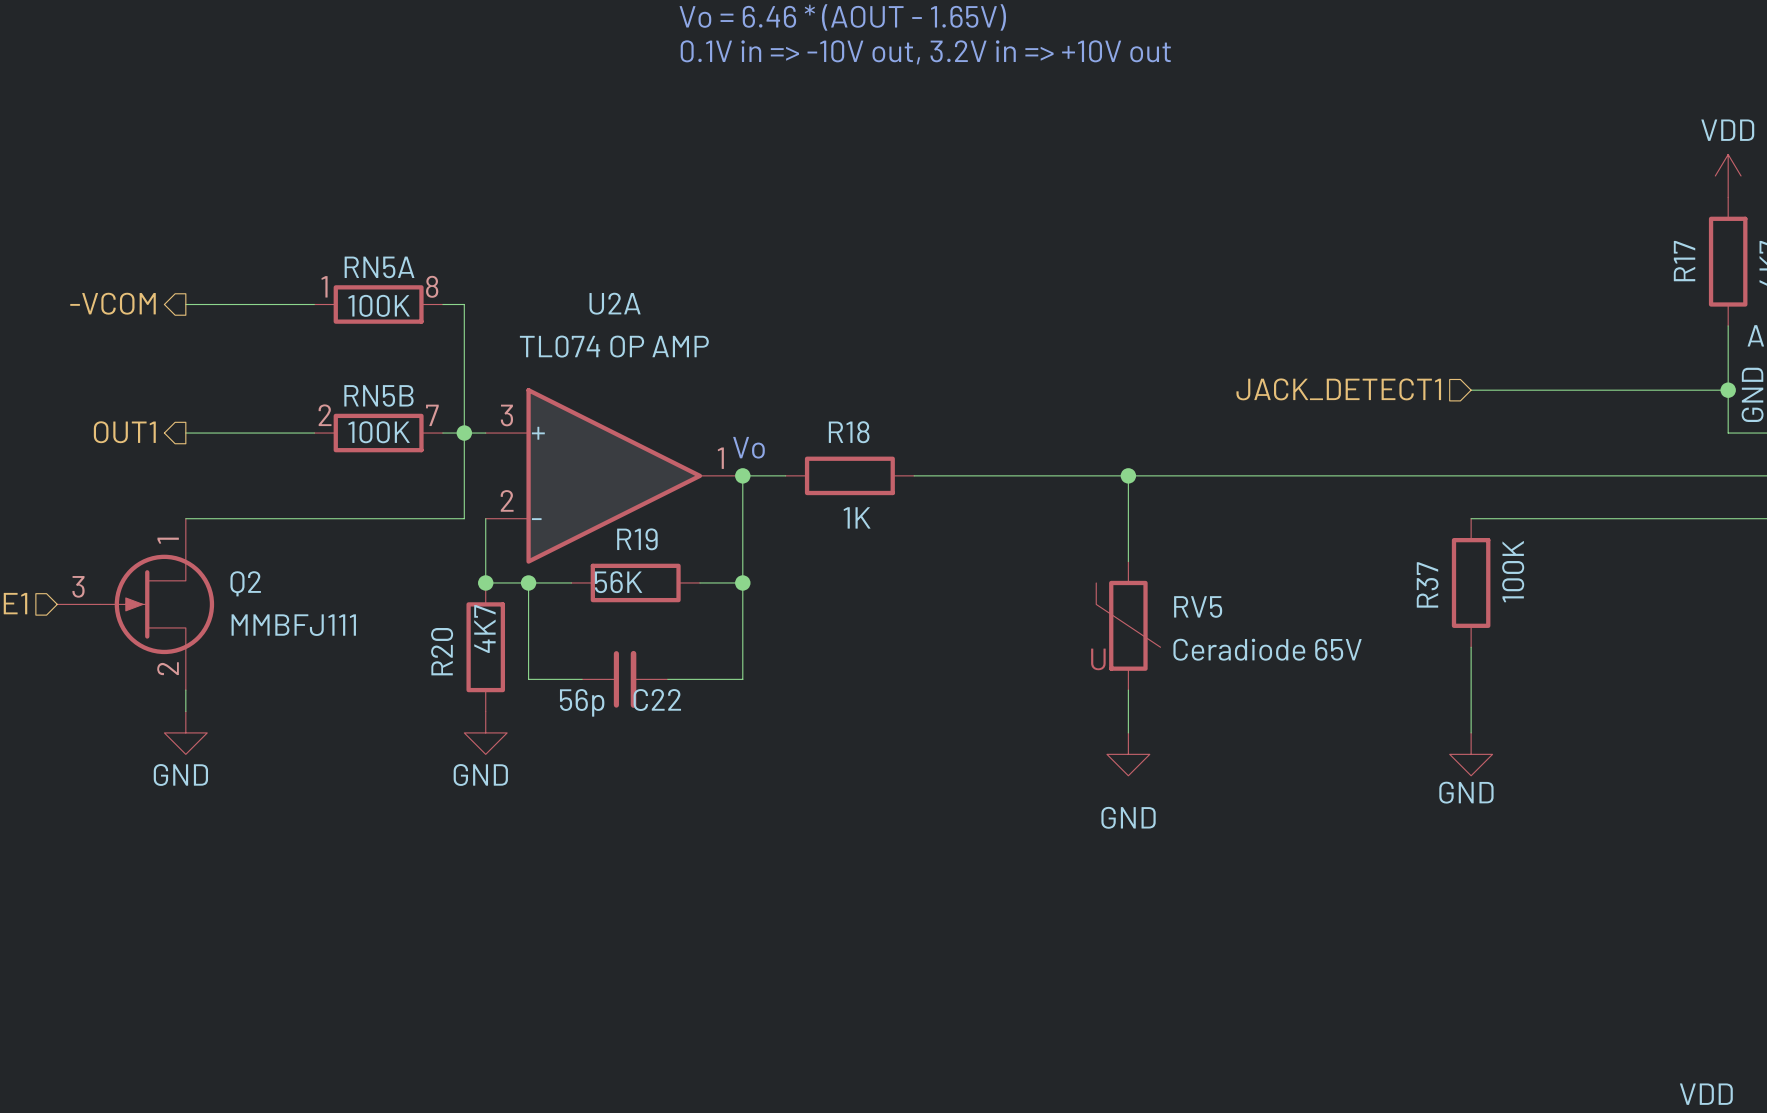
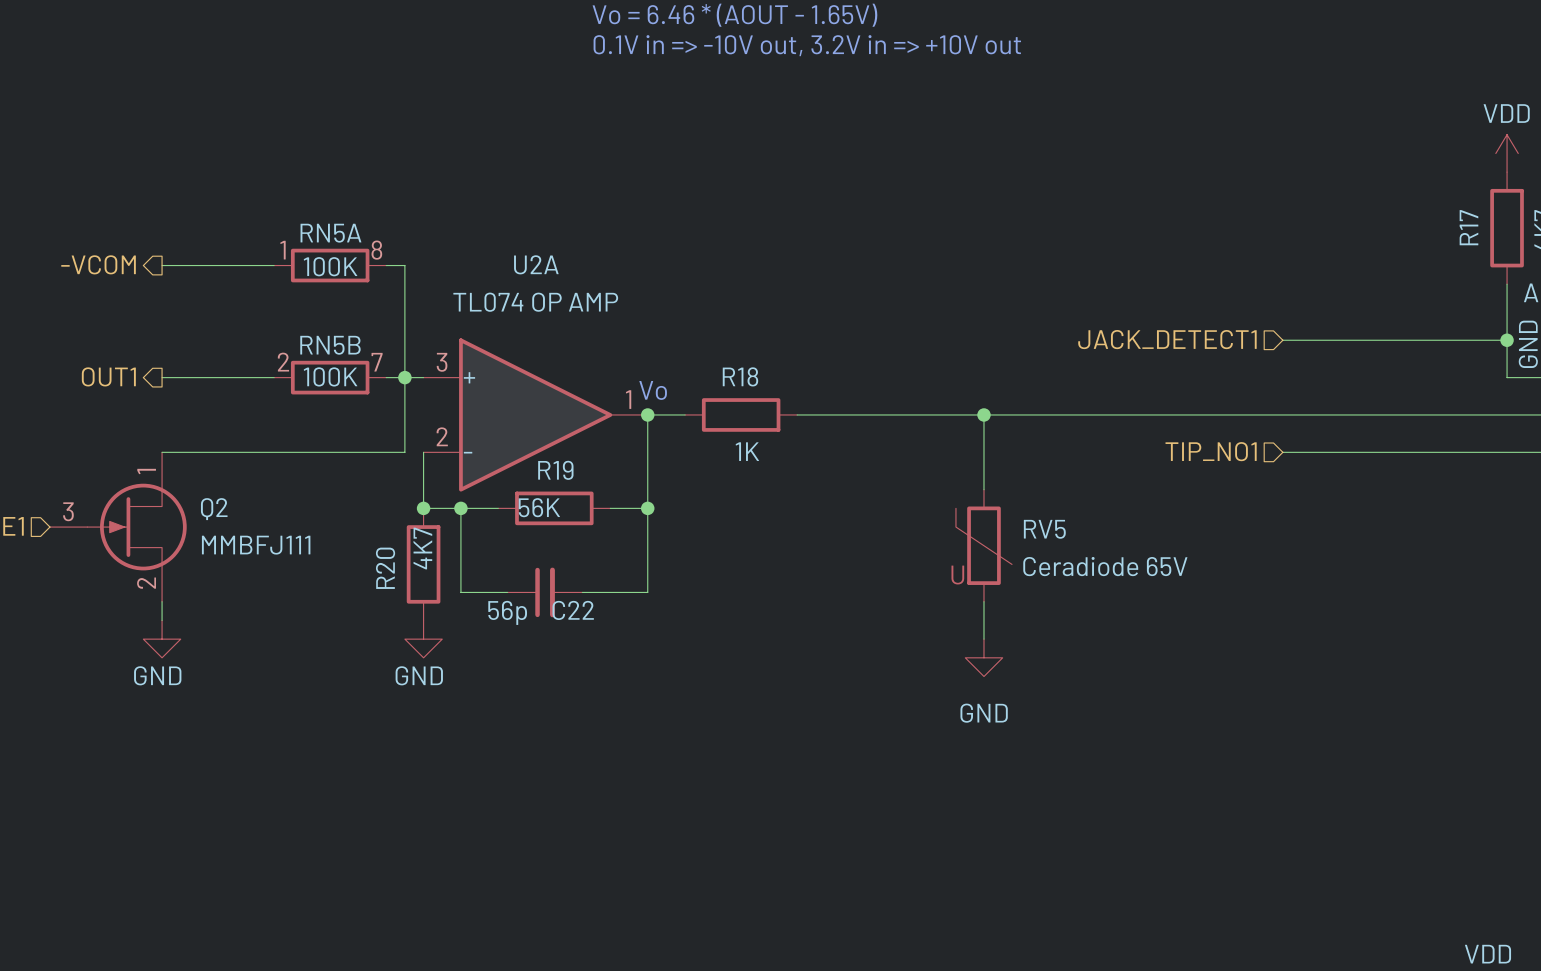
hierarchical label: none -> TIP_NO1 (1211, 451)
R37: 100K (1471, 582) -> none
wire: (1471, 647) (1471, 732) -> none
power symbol: GND (1471, 754) -> none

